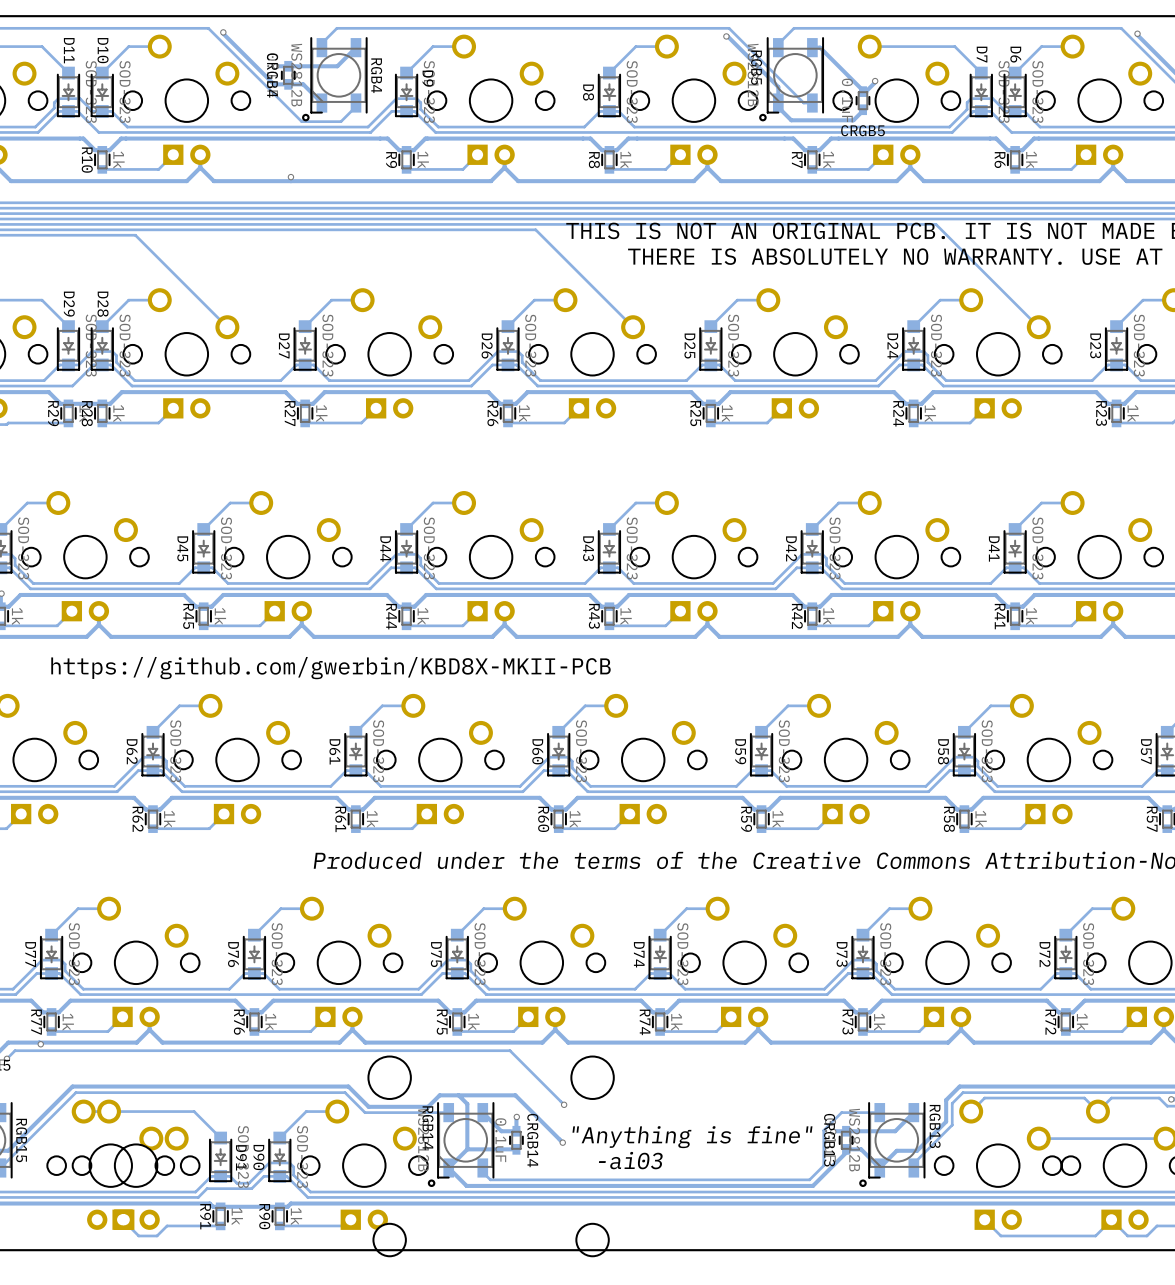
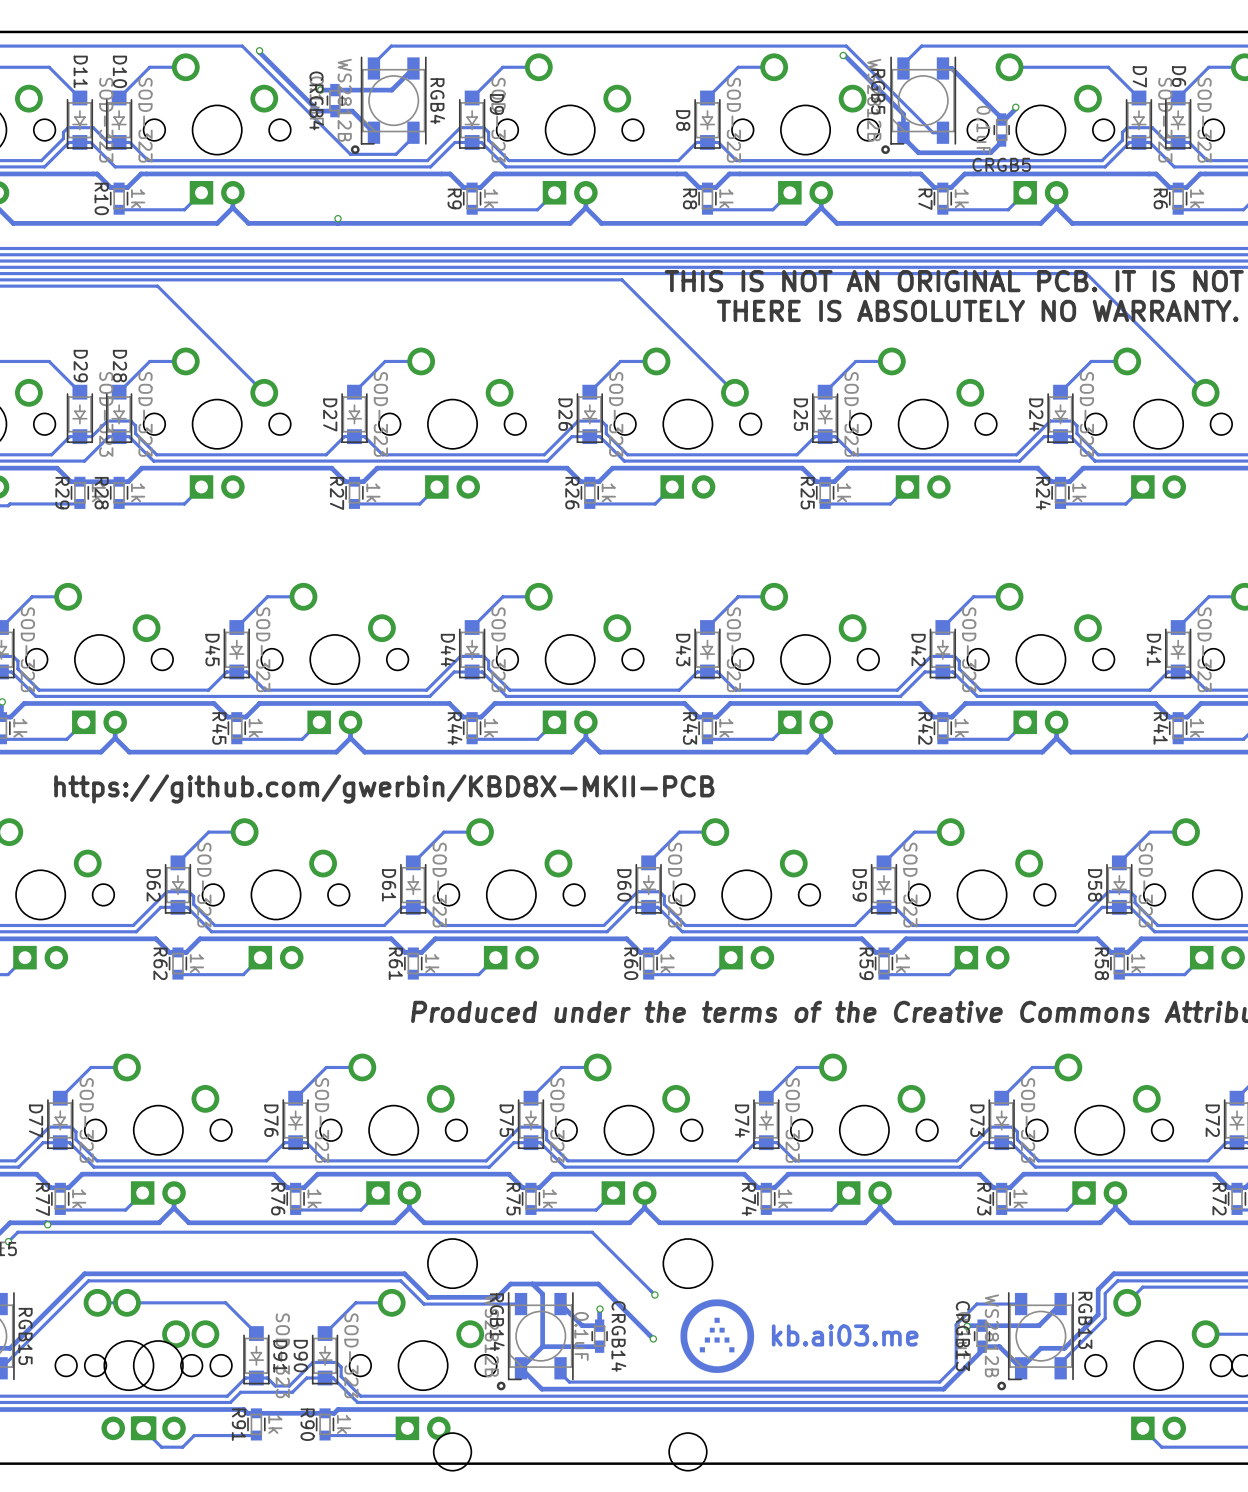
drawing: none -> [680, 1299, 755, 1373]
text: "Anything is fine" (692, 1137) -> none
text: none -> kb.ai03.me (845, 1335)
text: -ai03 (630, 1160) -> none

